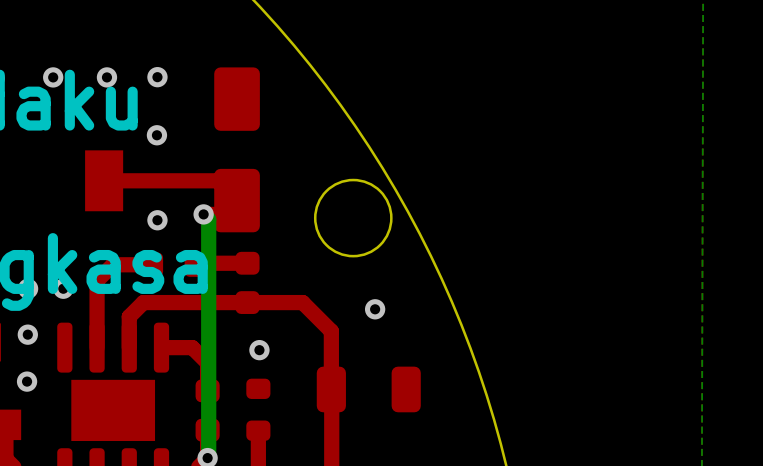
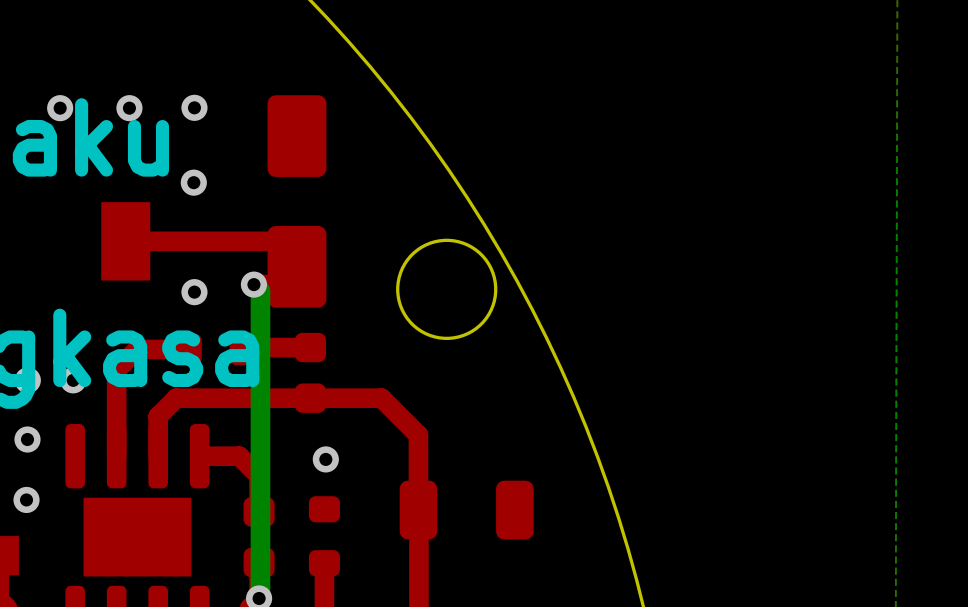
via: (375, 309) -> none

